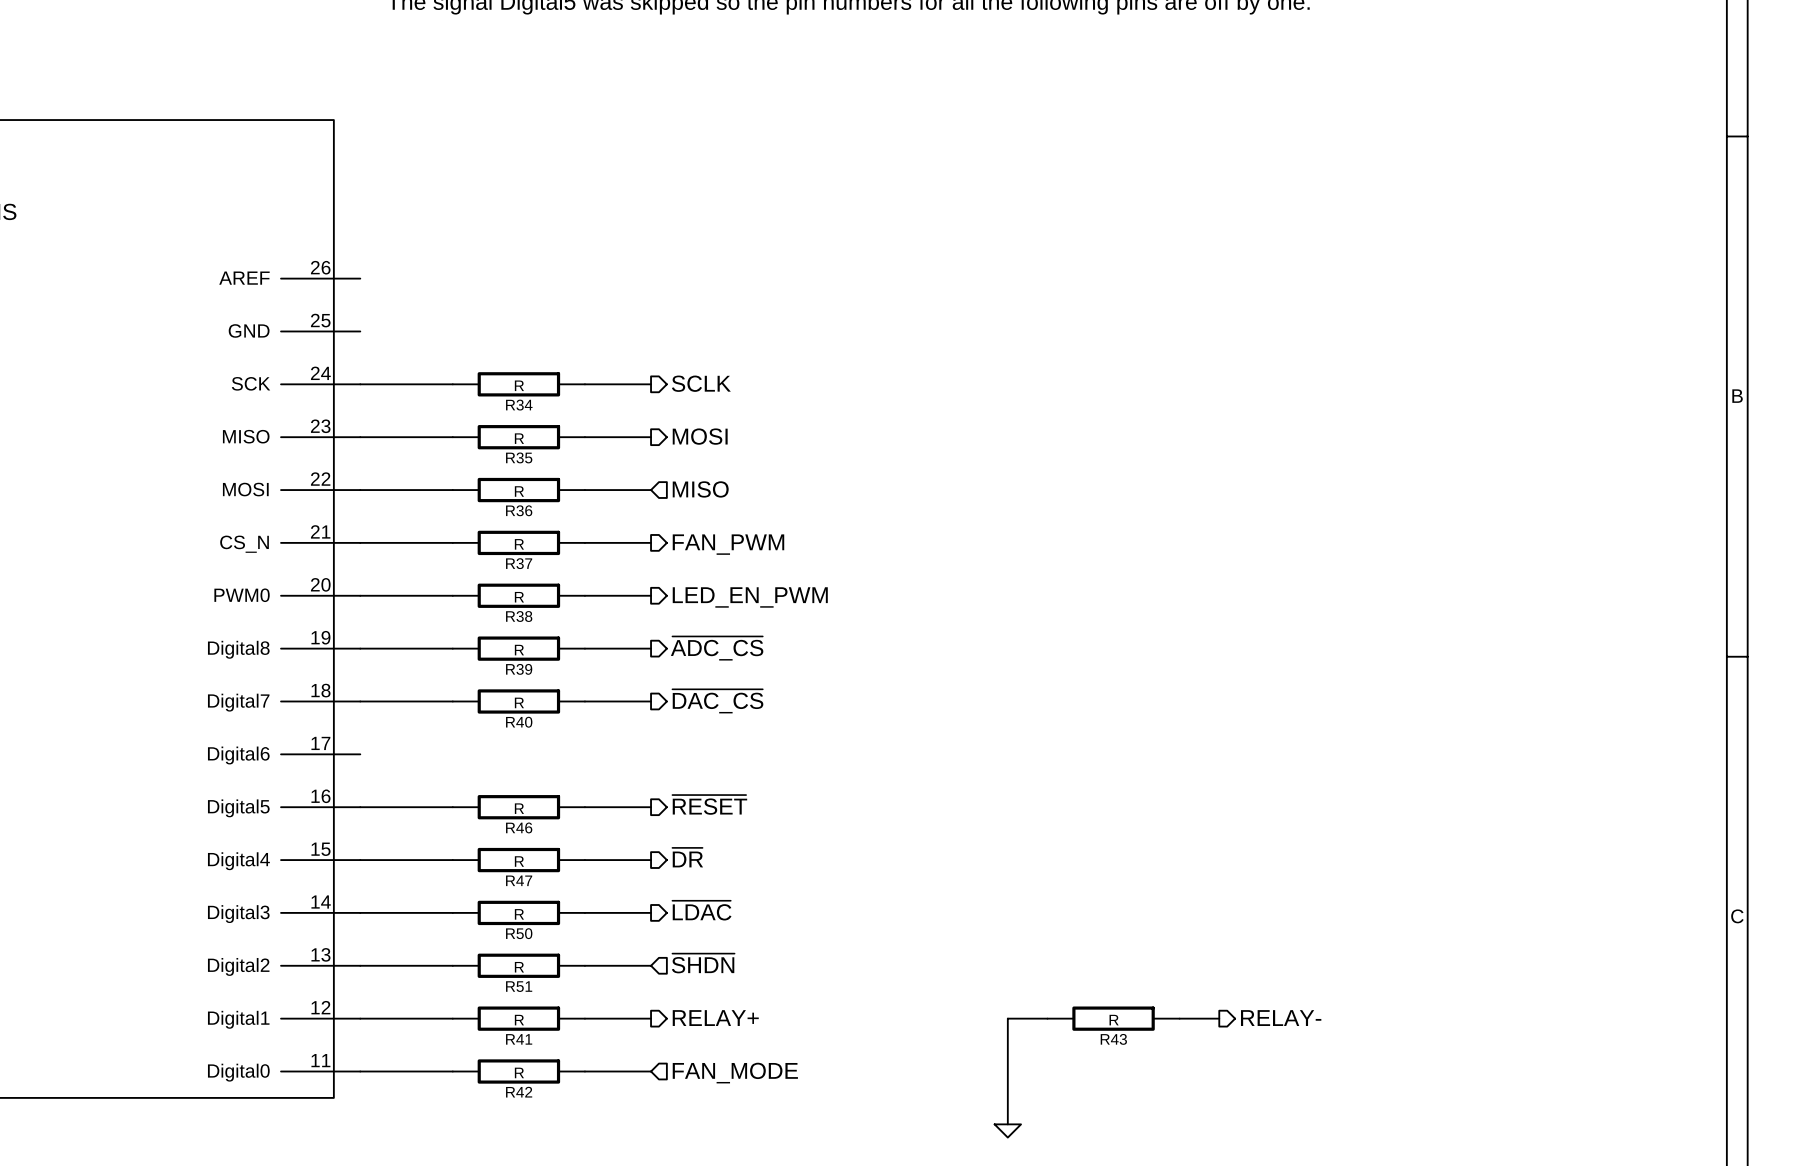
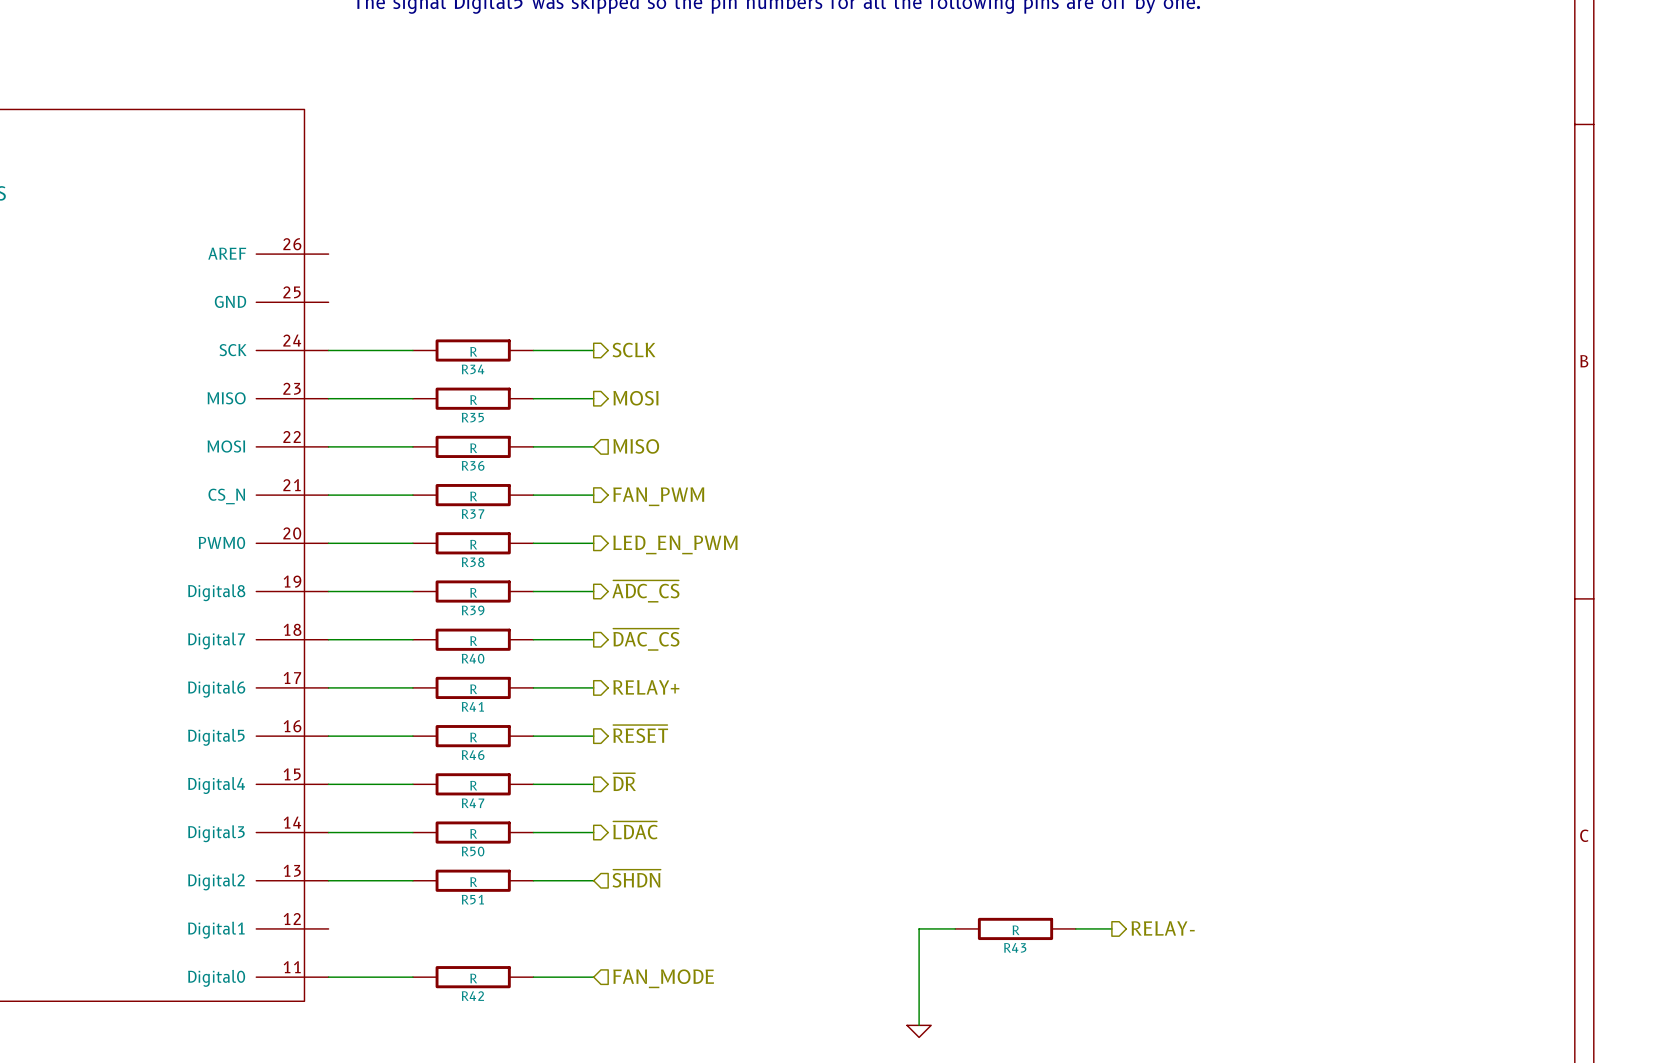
hierarchical label: none -> RELAY+ (646, 687)
wire: none -> (328, 687) (412, 687)
wire: none -> (533, 687) (593, 687)
wire: (360, 1018) (452, 1018) -> none
R41 position: (518, 1018) -> (473, 687)
wire: (584, 1018) (651, 1018) -> none
hierarchical label: RELAY+ (715, 1018) -> none

